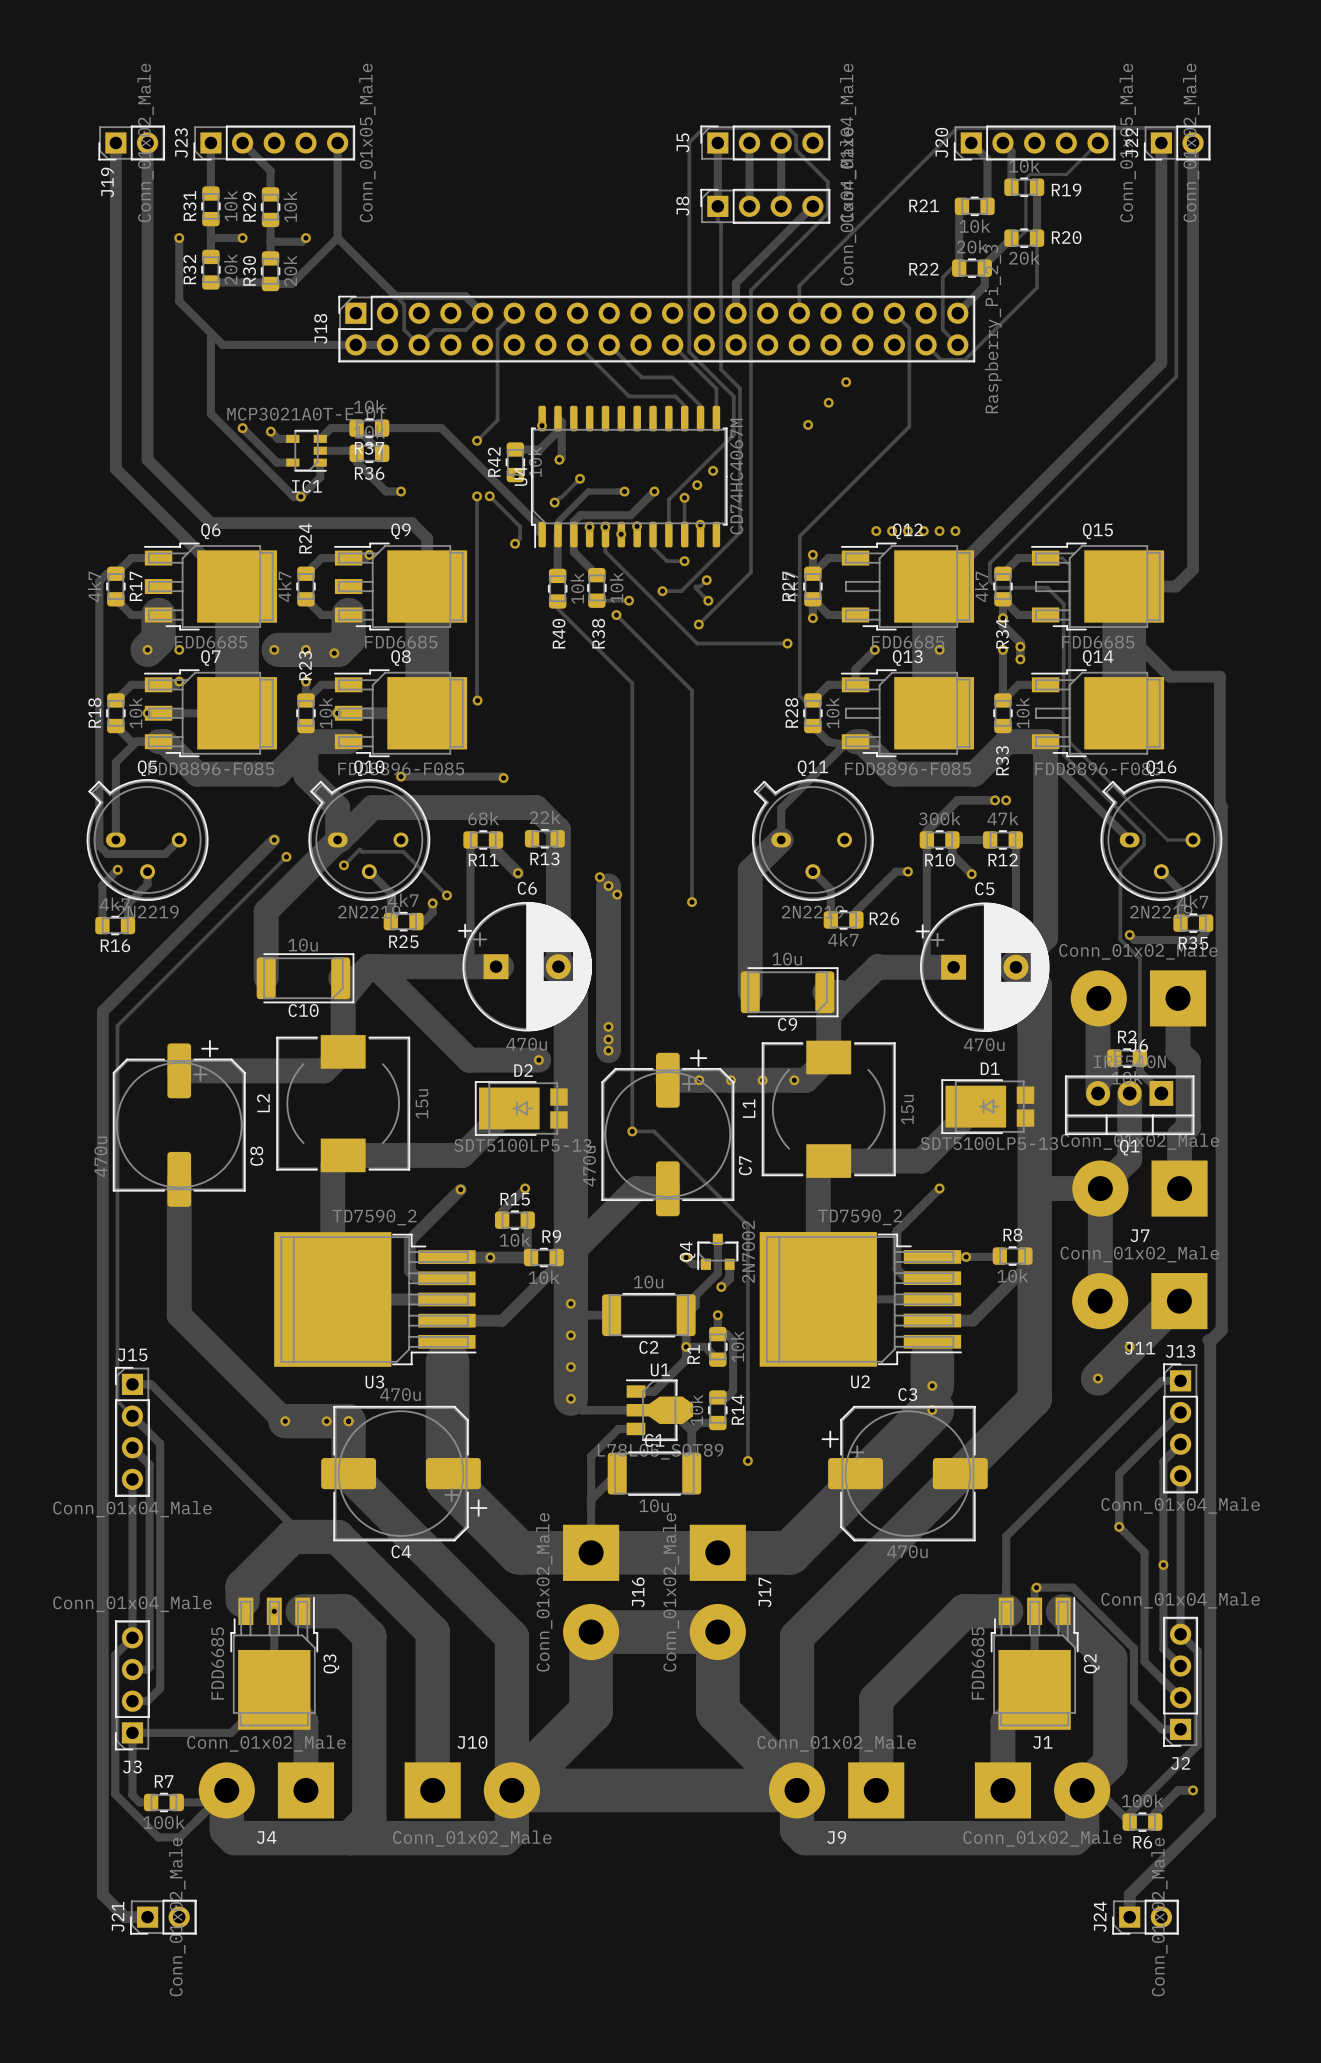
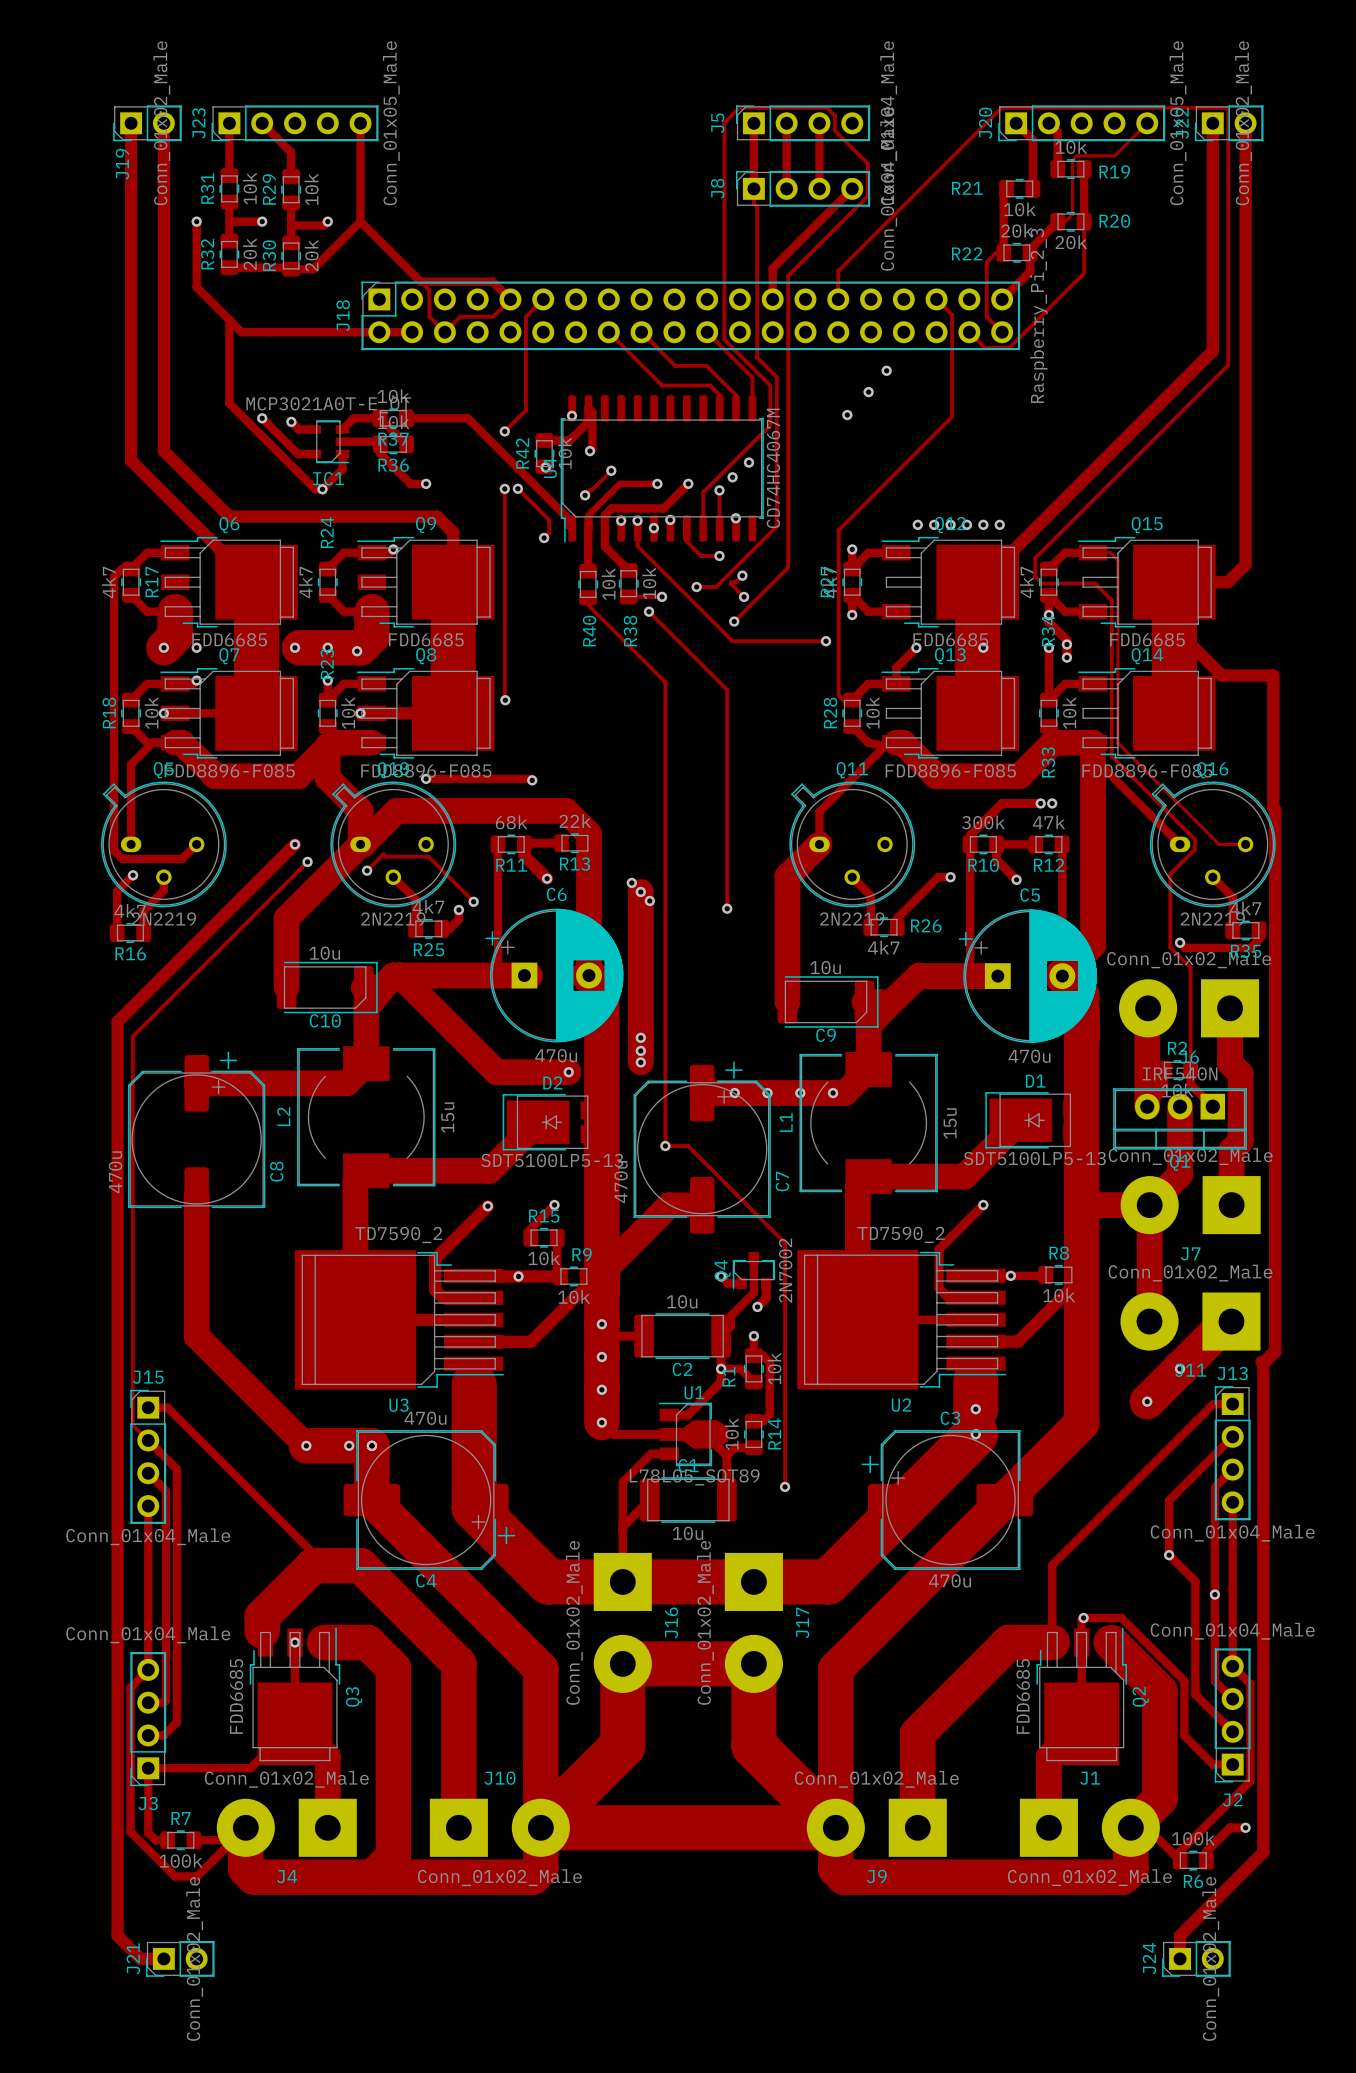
track: none -> (561, 843) (524, 844)

